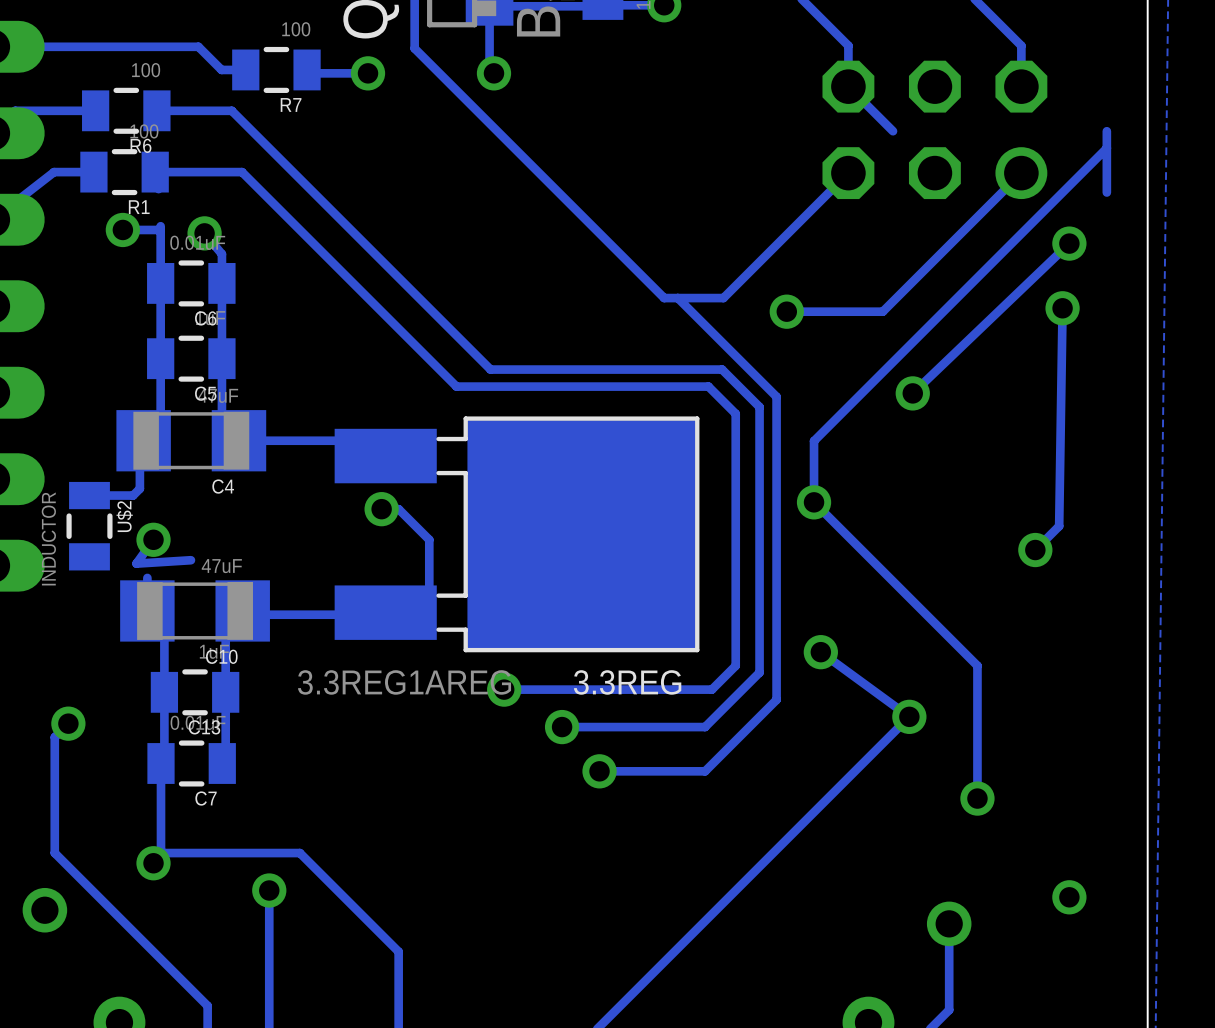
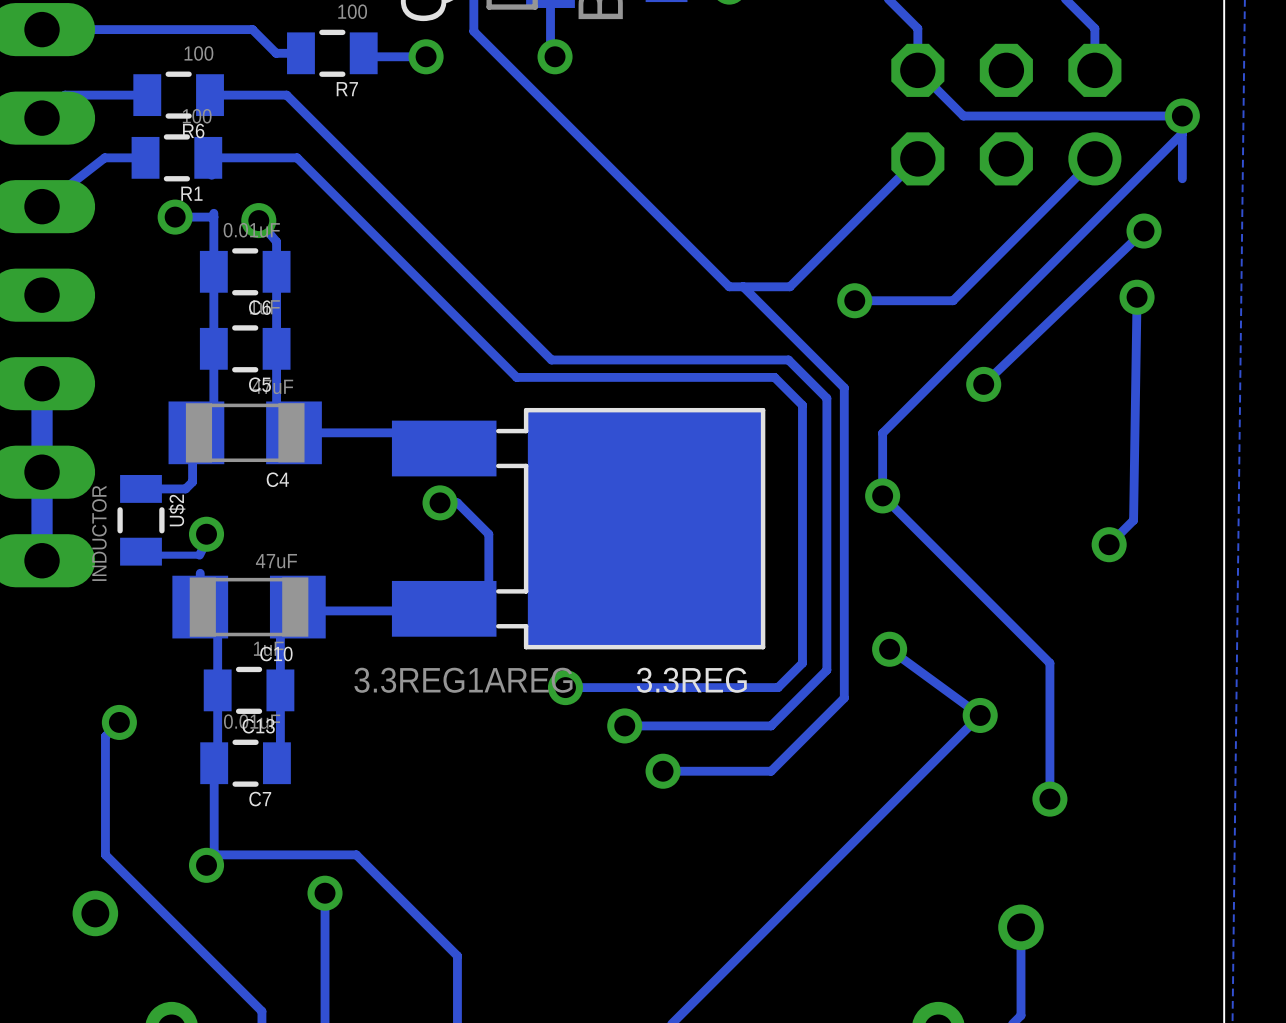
track: none -> (1182, 116) (963, 116)
via: none -> (1182, 116)
track: (153, 539) (136, 563) (190, 560) -> (206, 534) (206, 541) (199, 555) (144, 555) (141, 551)
via: (1069, 897) -> none

